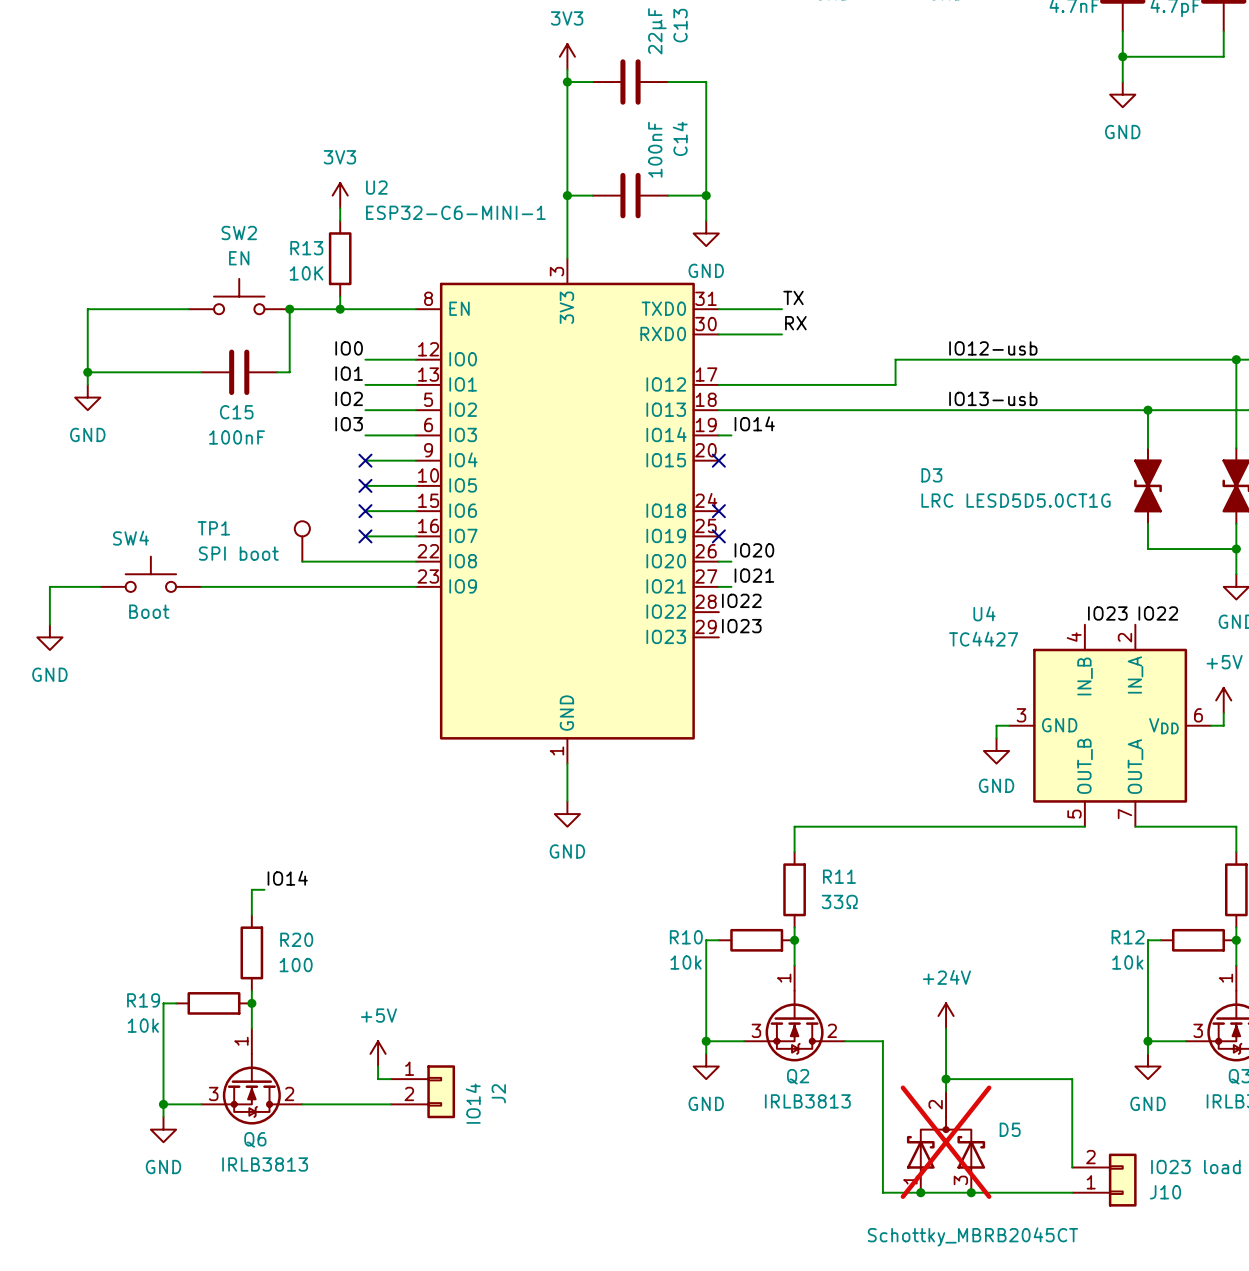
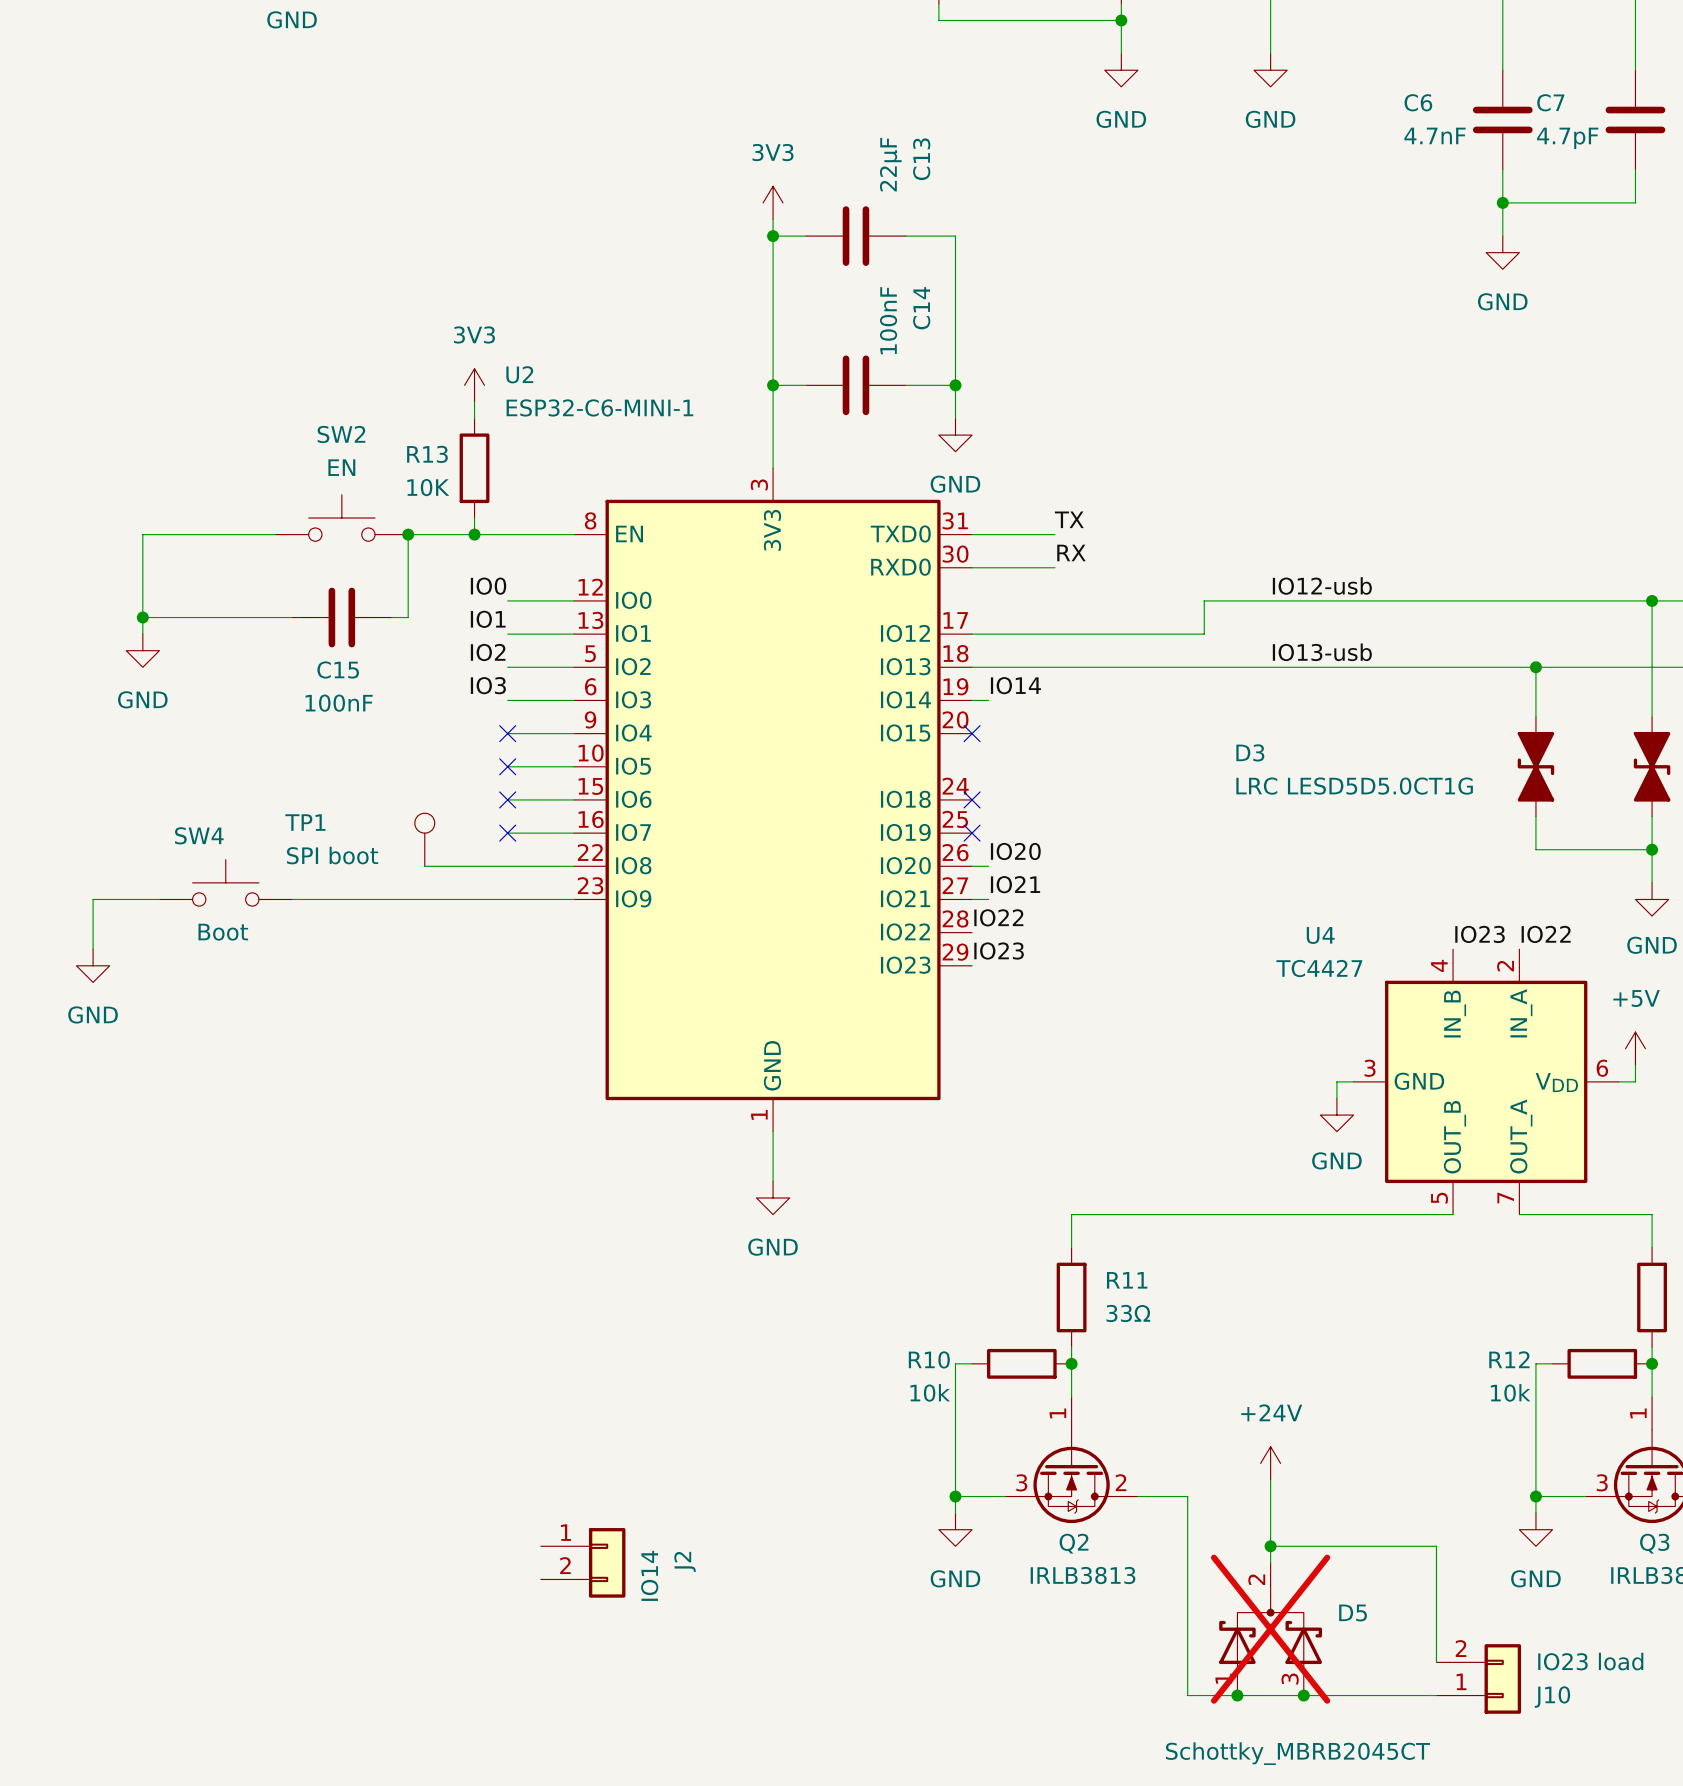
label: IO14 (287, 878) -> none
wire: (264, 889) (251, 889) (251, 915) -> none
R20: 100 (251, 952) -> none
wire: (251, 990) (251, 1028) -> none
wire: (176, 1003) (163, 1003) (163, 1116) -> none
R19: 10k (213, 1003) -> none
junction: (251, 1003) -> none
power symbol: +5V (378, 1053) -> none
wire: (378, 1066) (378, 1079) (390, 1079) -> none
Q6: IRLB3813 (251, 1076) -> none
wire: (163, 1104) (201, 1104) -> none
junction: (163, 1104) -> none
wire: (302, 1104) (390, 1104) -> none
power symbol: GND (163, 1129) -> none

